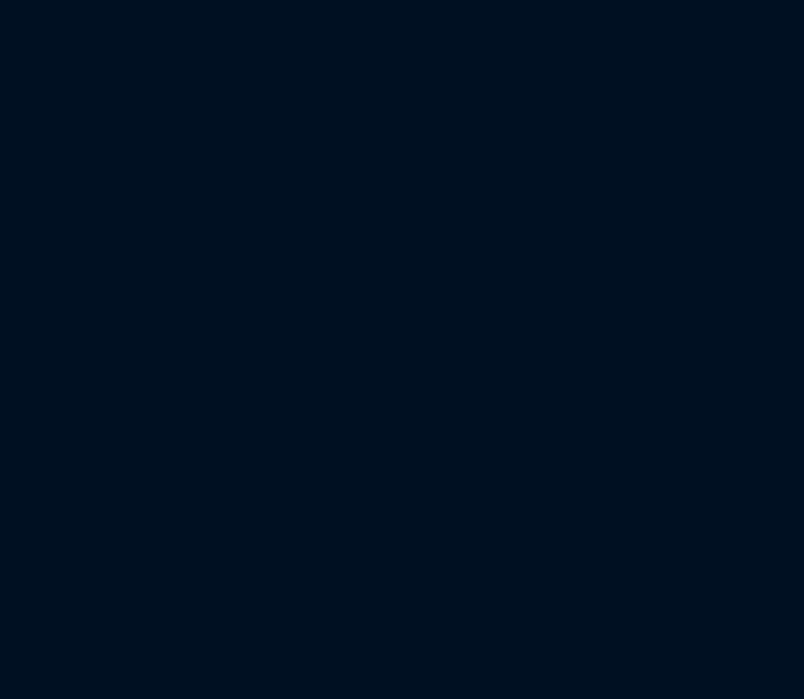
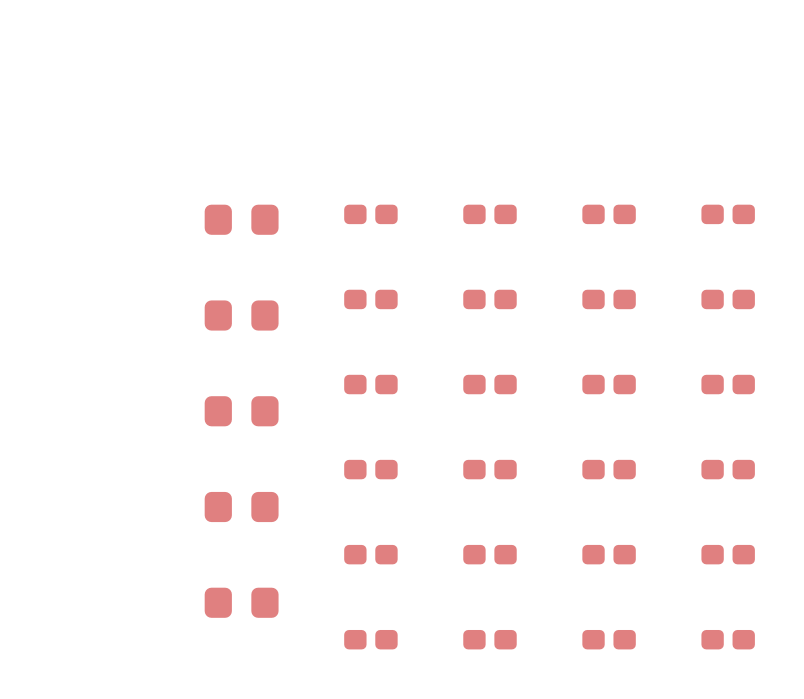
part: none -> (370, 214)
part: none -> (489, 214)
part: none -> (609, 214)
part: none -> (728, 214)
part: none -> (241, 219)
part: none -> (370, 299)
part: none -> (489, 299)
part: none -> (609, 299)
part: none -> (728, 299)
part: none -> (241, 315)
part: none -> (370, 384)
part: none -> (489, 384)
part: none -> (609, 384)
part: none -> (728, 384)
part: none -> (241, 411)
part: none -> (370, 469)
part: none -> (489, 469)
part: none -> (609, 469)
part: none -> (728, 469)
part: none -> (241, 507)
part: none -> (370, 554)
part: none -> (489, 554)
part: none -> (609, 554)
part: none -> (728, 554)
part: none -> (241, 602)
part: none -> (370, 639)
part: none -> (489, 639)
part: none -> (609, 639)
part: none -> (728, 639)

